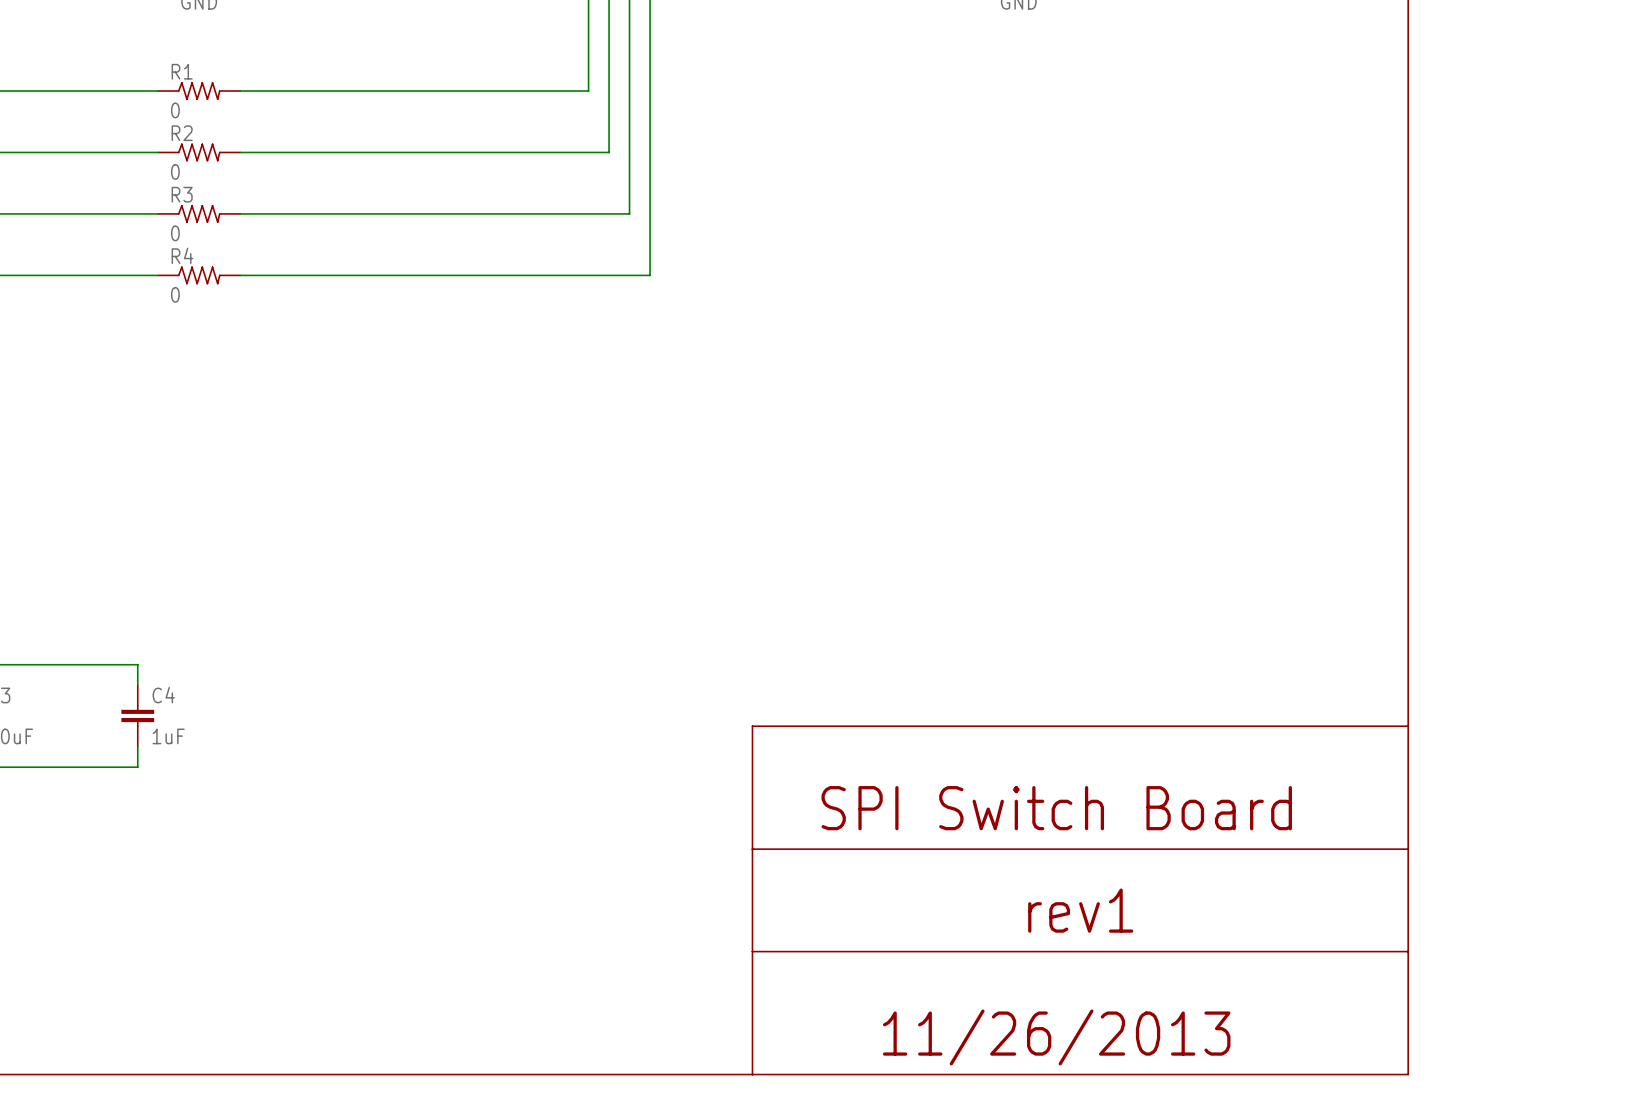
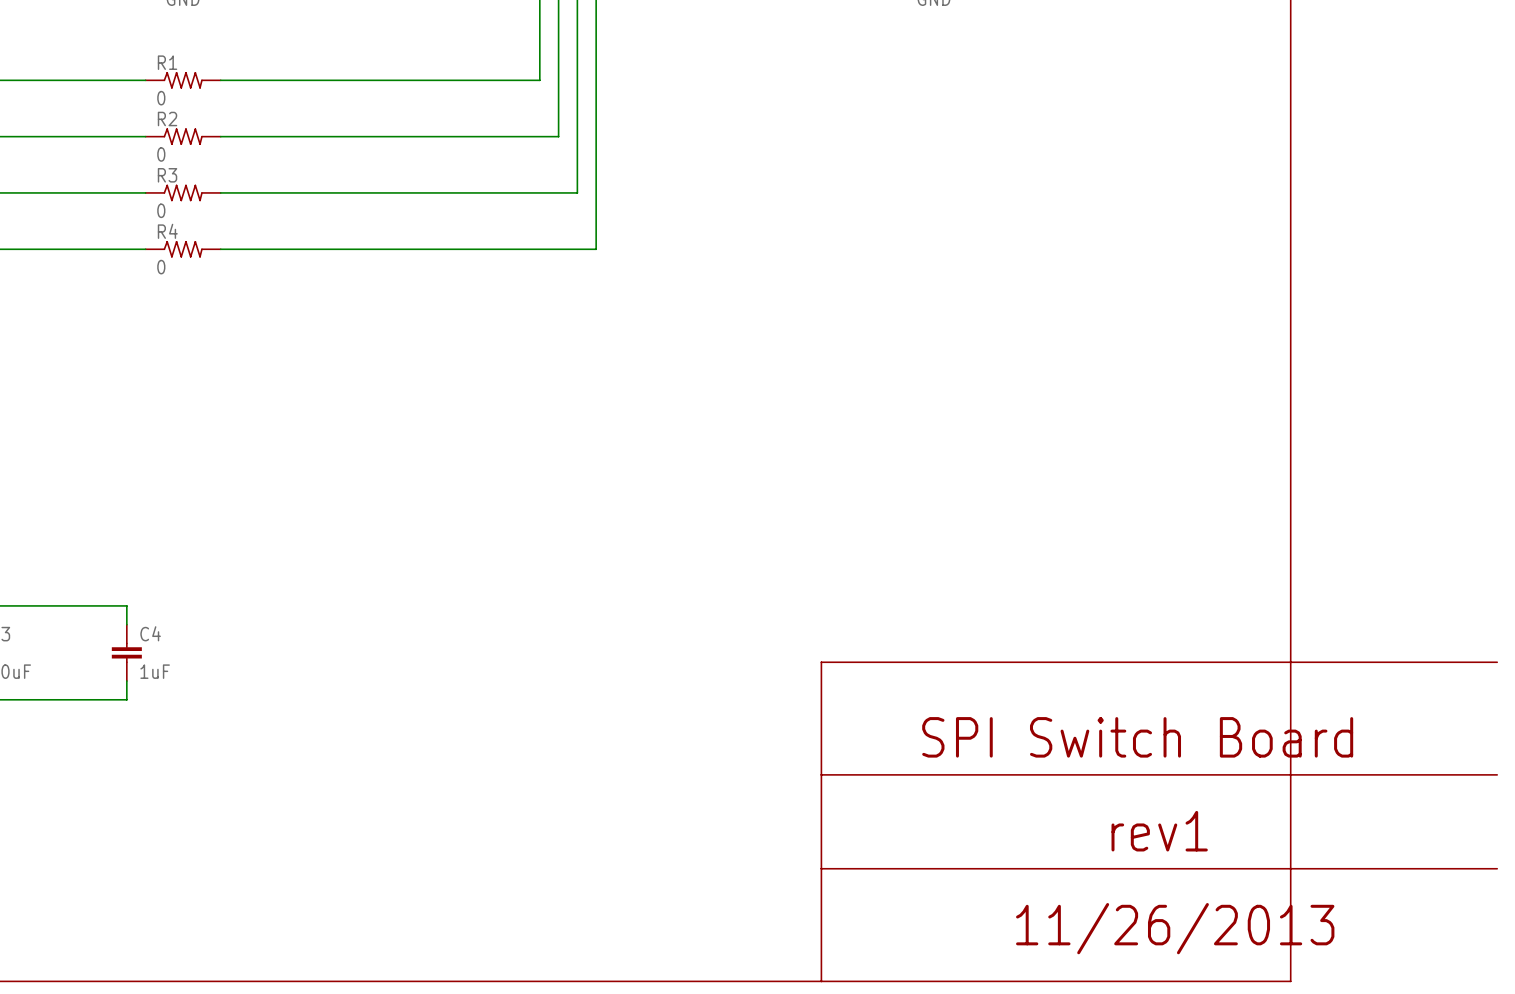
line: (895, 726) (752, 726) (752, 1074) -> (821, 662) (821, 981)
line: none -> (1290, 662) (1497, 662)
text position: SPI Switch Board (1056, 808) -> SPI Switch Board (1137, 737)
line: (752, 849) (895, 849) -> none
line: none -> (1290, 774) (1497, 774)
text position: rev1 (1080, 910) -> rev1 (1159, 831)
line: (752, 951) (895, 951) -> none
line: none -> (1290, 868) (1497, 868)
text: none -> 11/26/2013 (1175, 928)
text: 11/26/2013 (1056, 1037) -> none

